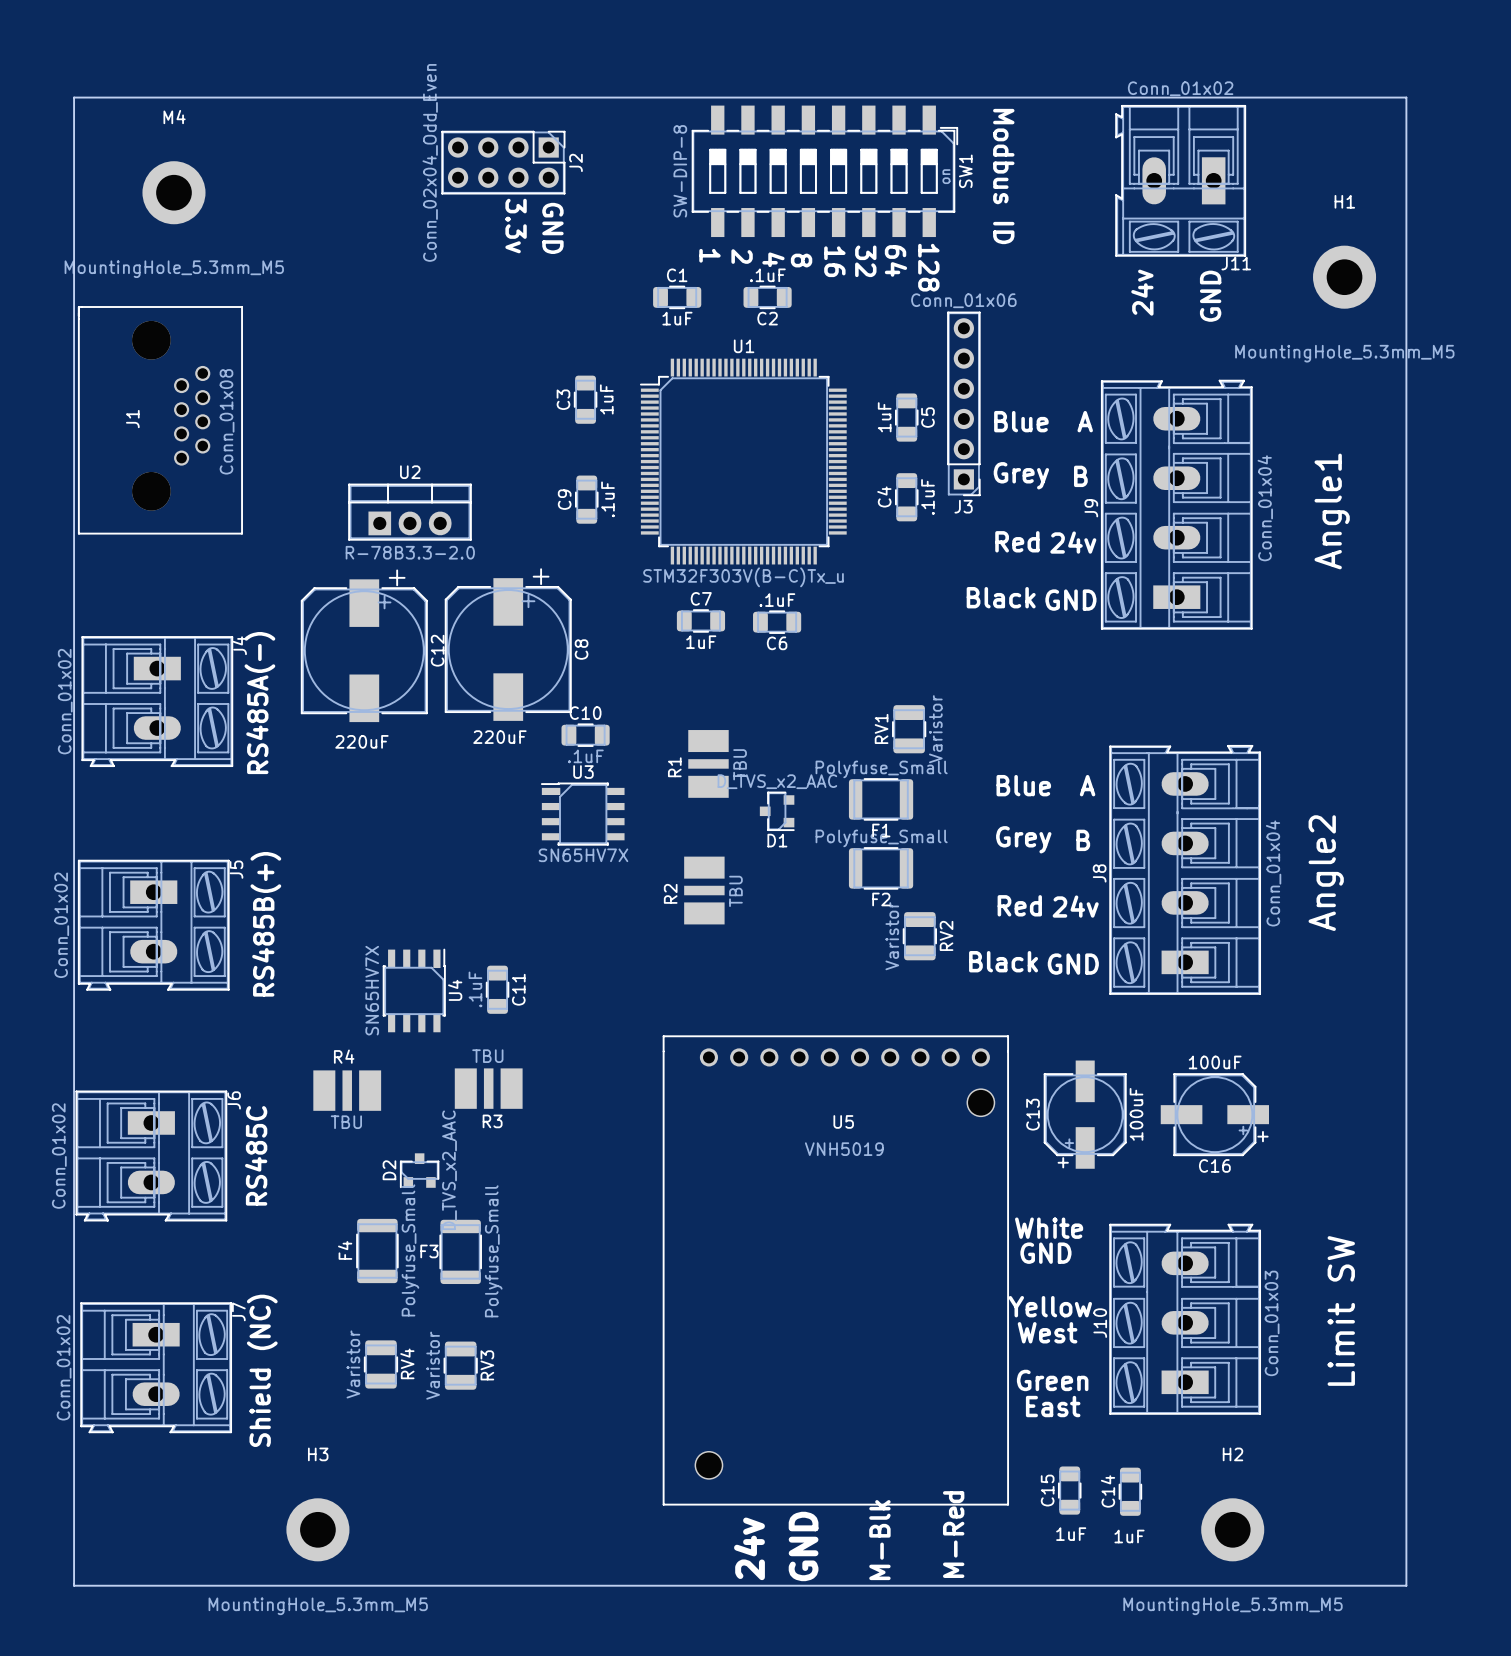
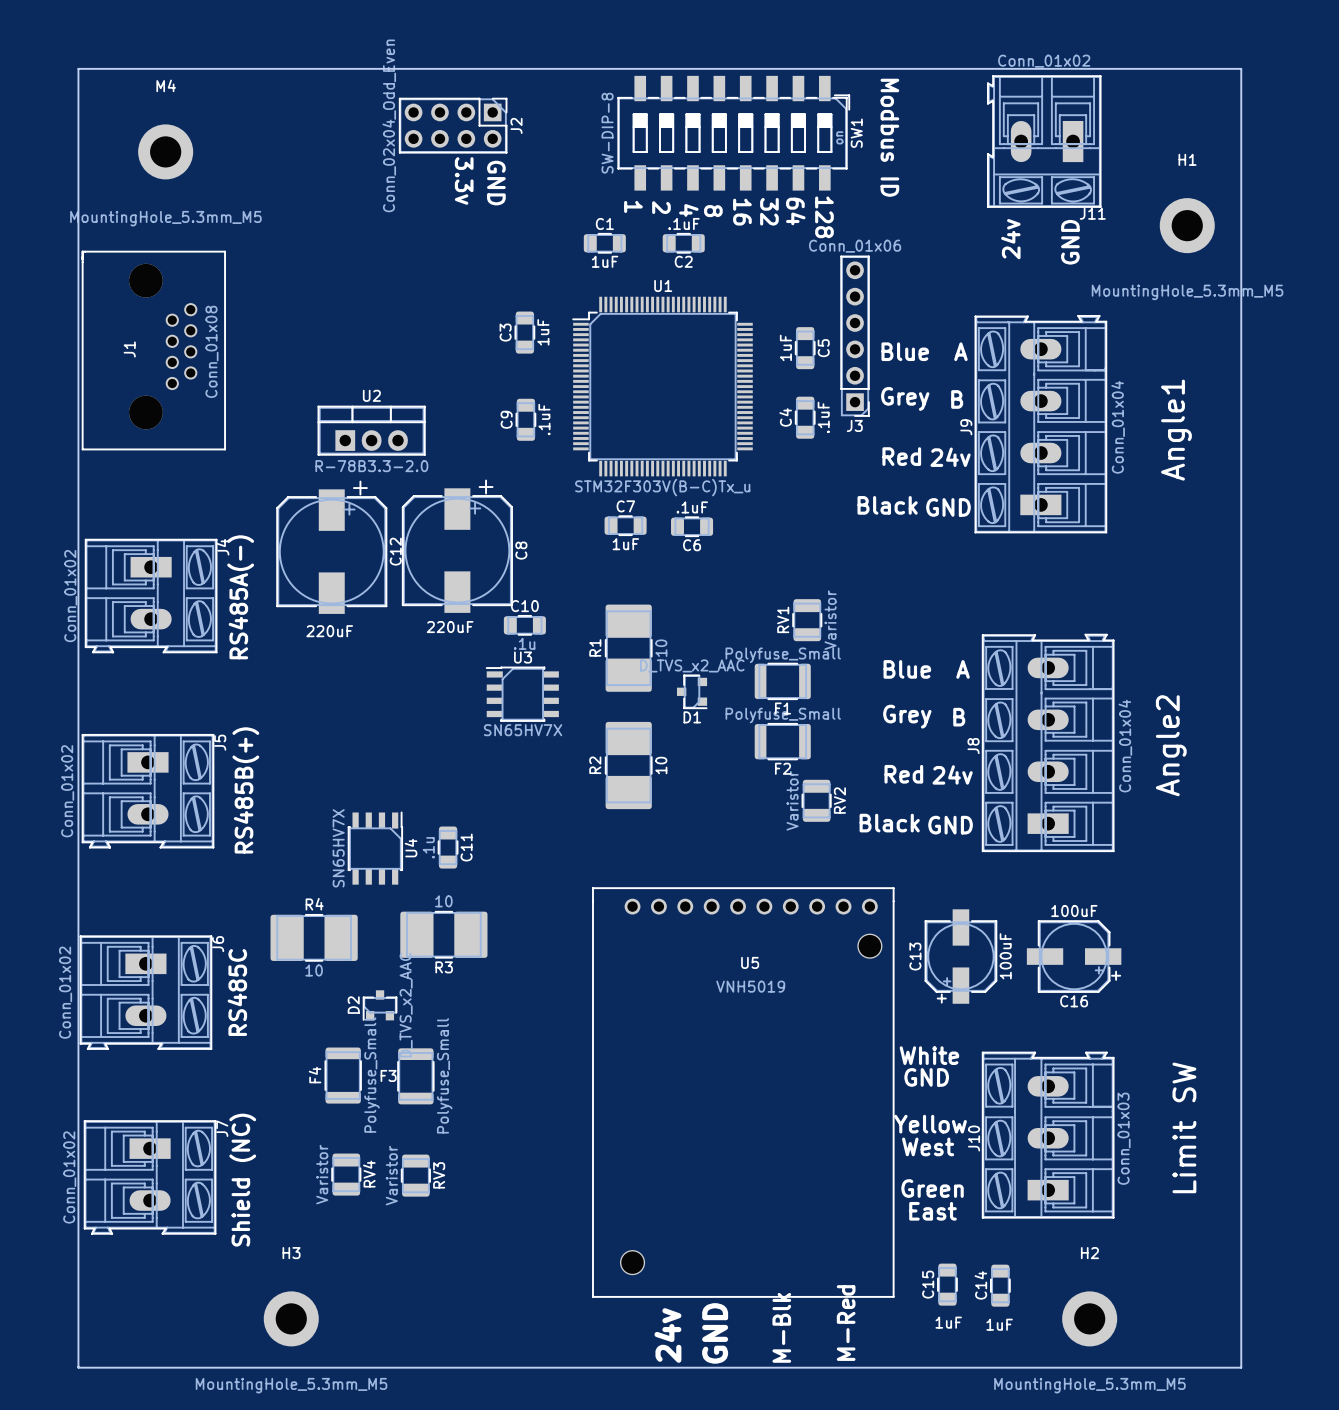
R1 footprint: [688, 730, 729, 798] -> [605, 604, 653, 692]
C10 value: .1uF (585, 756) -> .1u (524, 643)
R1 value: TBU (740, 764) -> 10 (661, 648)
R2 footprint: [684, 856, 725, 925] -> [605, 721, 653, 810]
R2 value: TBU (735, 891) -> 10 (661, 765)
C11 value: .1uF (475, 989) -> .1u (428, 847)
R3 value: TBU (487, 1056) -> 10 (443, 901)
R3 footprint: [454, 1068, 523, 1109] -> [400, 911, 488, 959]
R4 footprint: [313, 1070, 382, 1111] -> [270, 914, 358, 962]
R4 value: TBU (346, 1122) -> 10 (314, 970)

